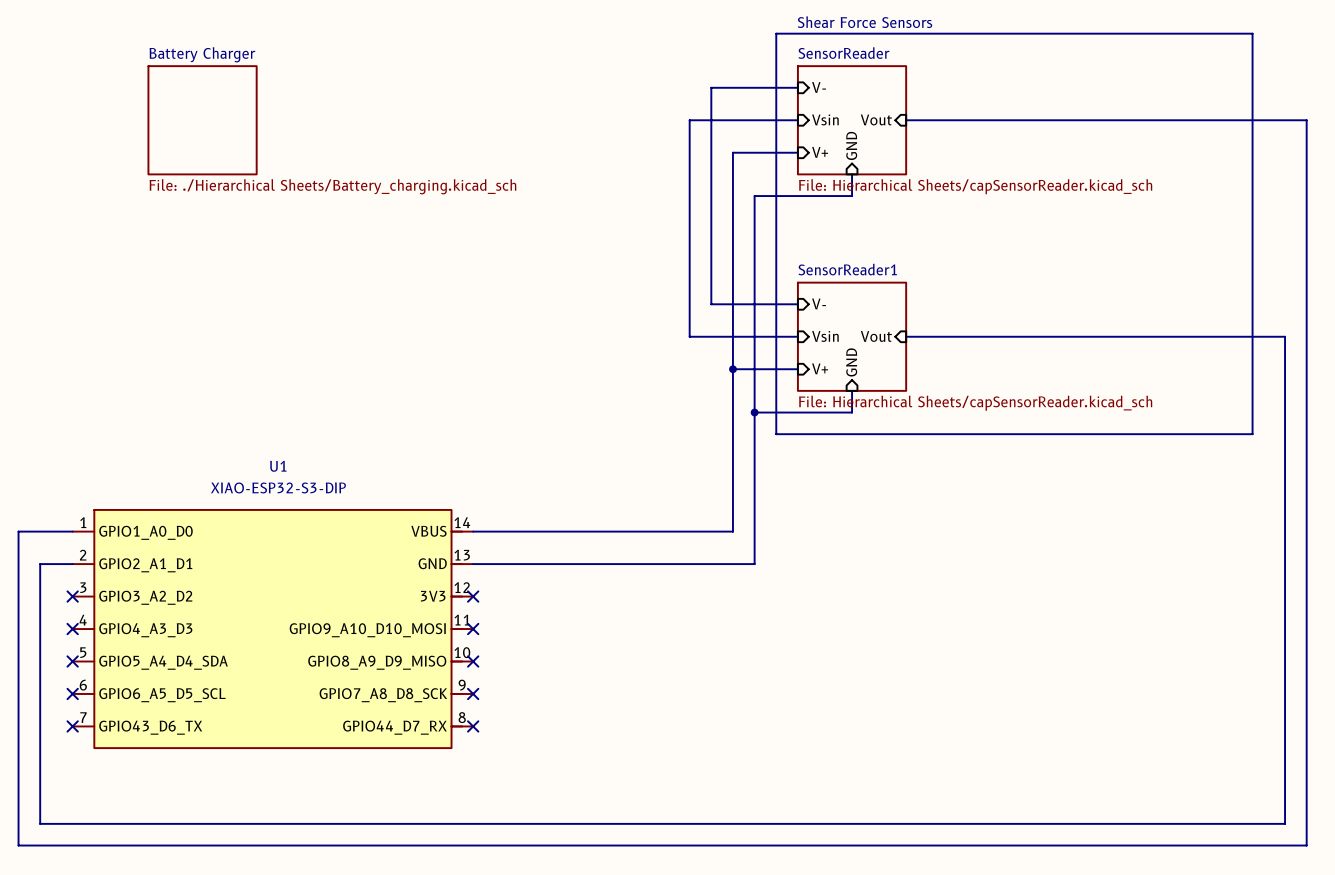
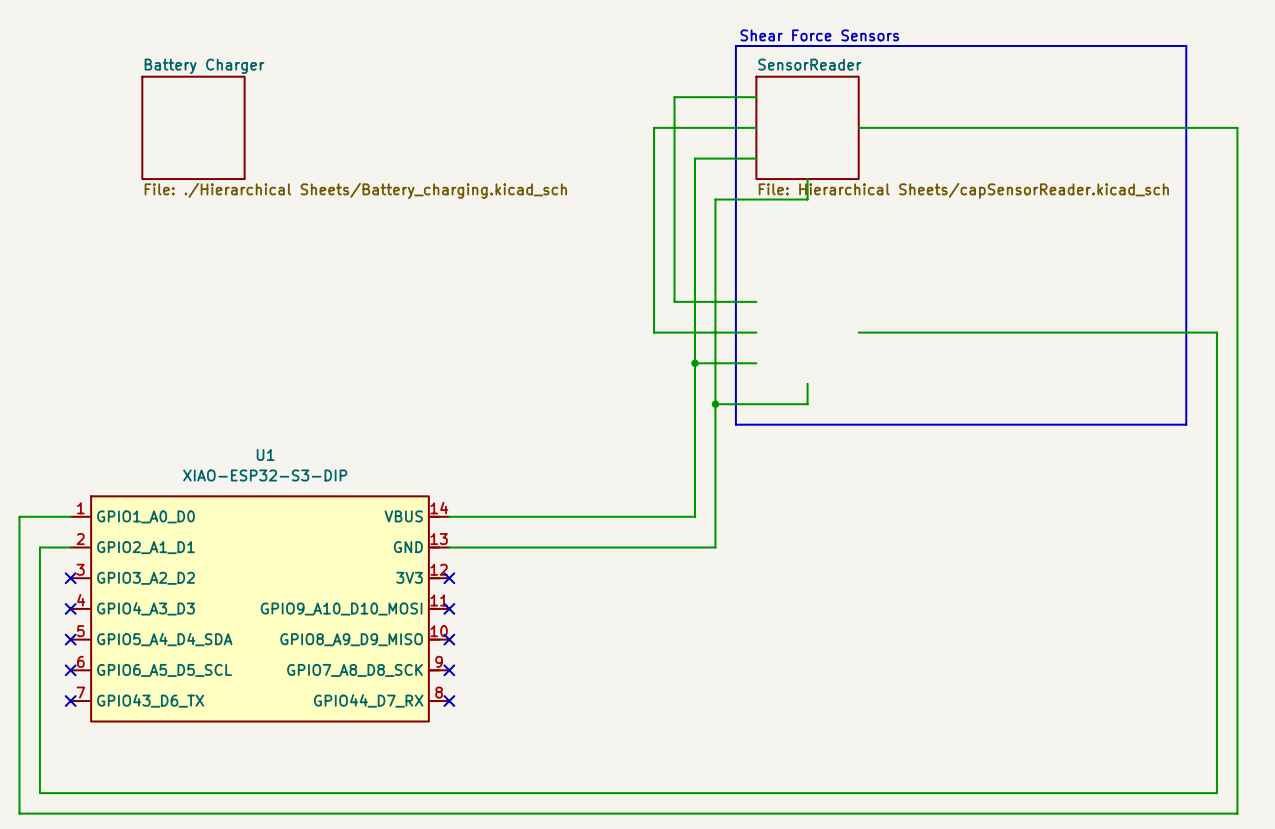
sheet pin: V- (819, 87) -> none
sheet pin: Vsin (825, 119) -> none
sheet pin: Vout (876, 119) -> none
sheet pin: GND (851, 145) -> none
sheet pin: V+ (820, 152) -> none
sheet pin: V- (819, 303) -> none
sheet pin: Vsin (825, 336) -> none
sheet SensorReader1: File: Hierarchical Sheets/capSensorReader.kicad_sch (852, 336) -> none
sheet pin: Vout (876, 336) -> none
sheet pin: GND (851, 362) -> none
sheet pin: V+ (820, 368) -> none

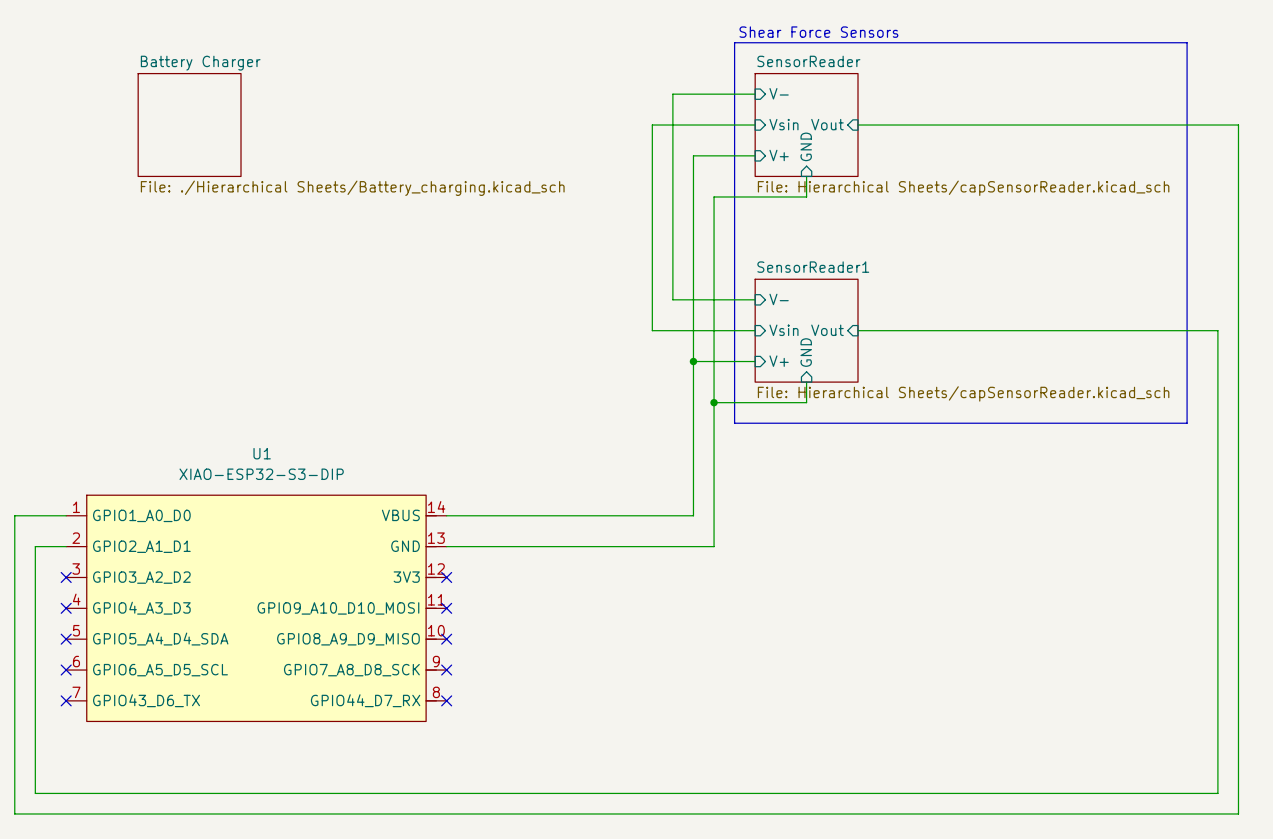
sheet pin: none -> V- (779, 93)
sheet pin: none -> Vsin (783, 124)
sheet pin: none -> Vout (827, 124)
sheet pin: none -> GND (806, 146)
sheet pin: none -> V+ (779, 155)
sheet pin: none -> V- (779, 299)
sheet pin: none -> Vsin (783, 330)
sheet SensorReader1: none -> File: Hierarchical Sheets/capSensorReader.kicad_sch (806, 330)
sheet pin: none -> Vout (827, 330)
sheet pin: none -> GND (806, 352)
sheet pin: none -> V+ (779, 361)

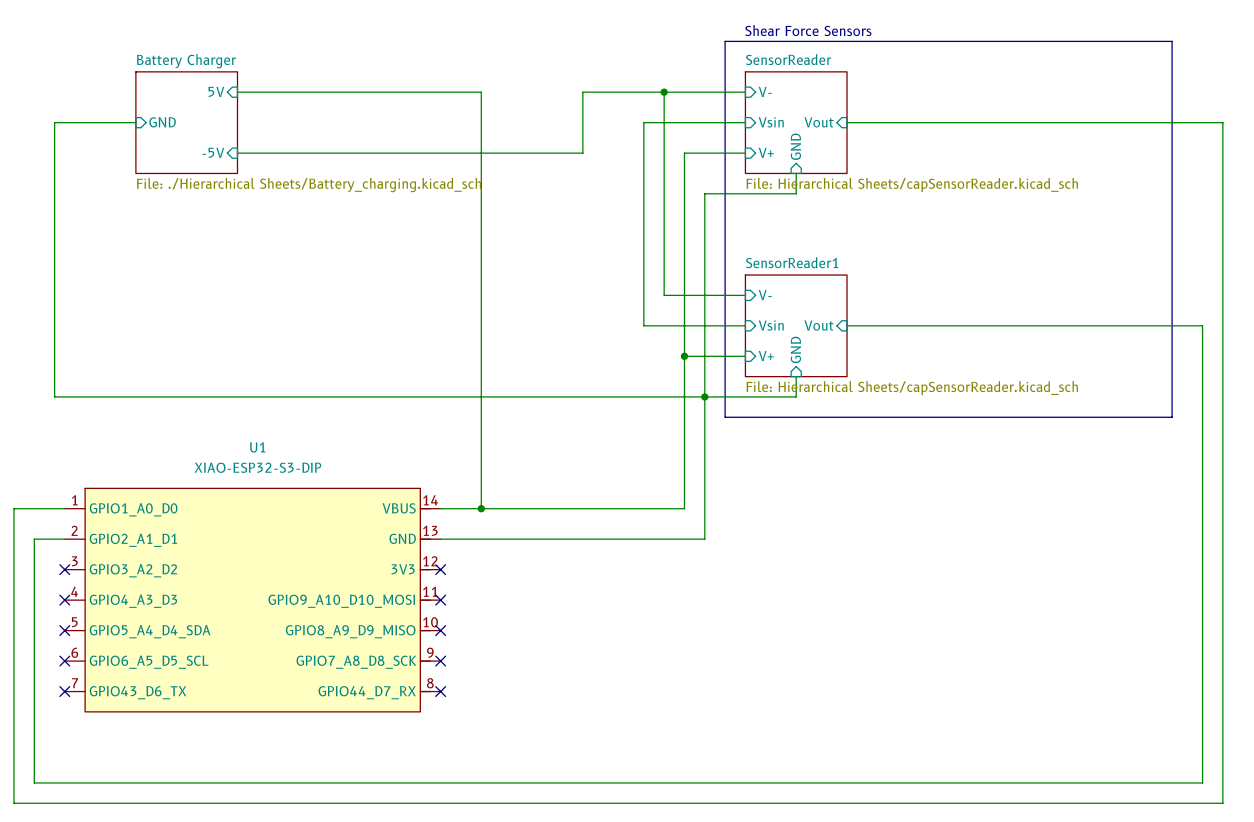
sheet pin: none -> 5V (216, 91)
wire: none -> (237, 92) (481, 92) (481, 508)
wire: none -> (664, 92) (582, 92) (582, 153) (237, 153)
junction: none -> (664, 92)
sheet pin: none -> GND (162, 122)
wire: none -> (135, 122) (54, 122) (54, 396) (704, 396)
sheet pin: none -> -5V (213, 152)
junction: none -> (481, 508)

